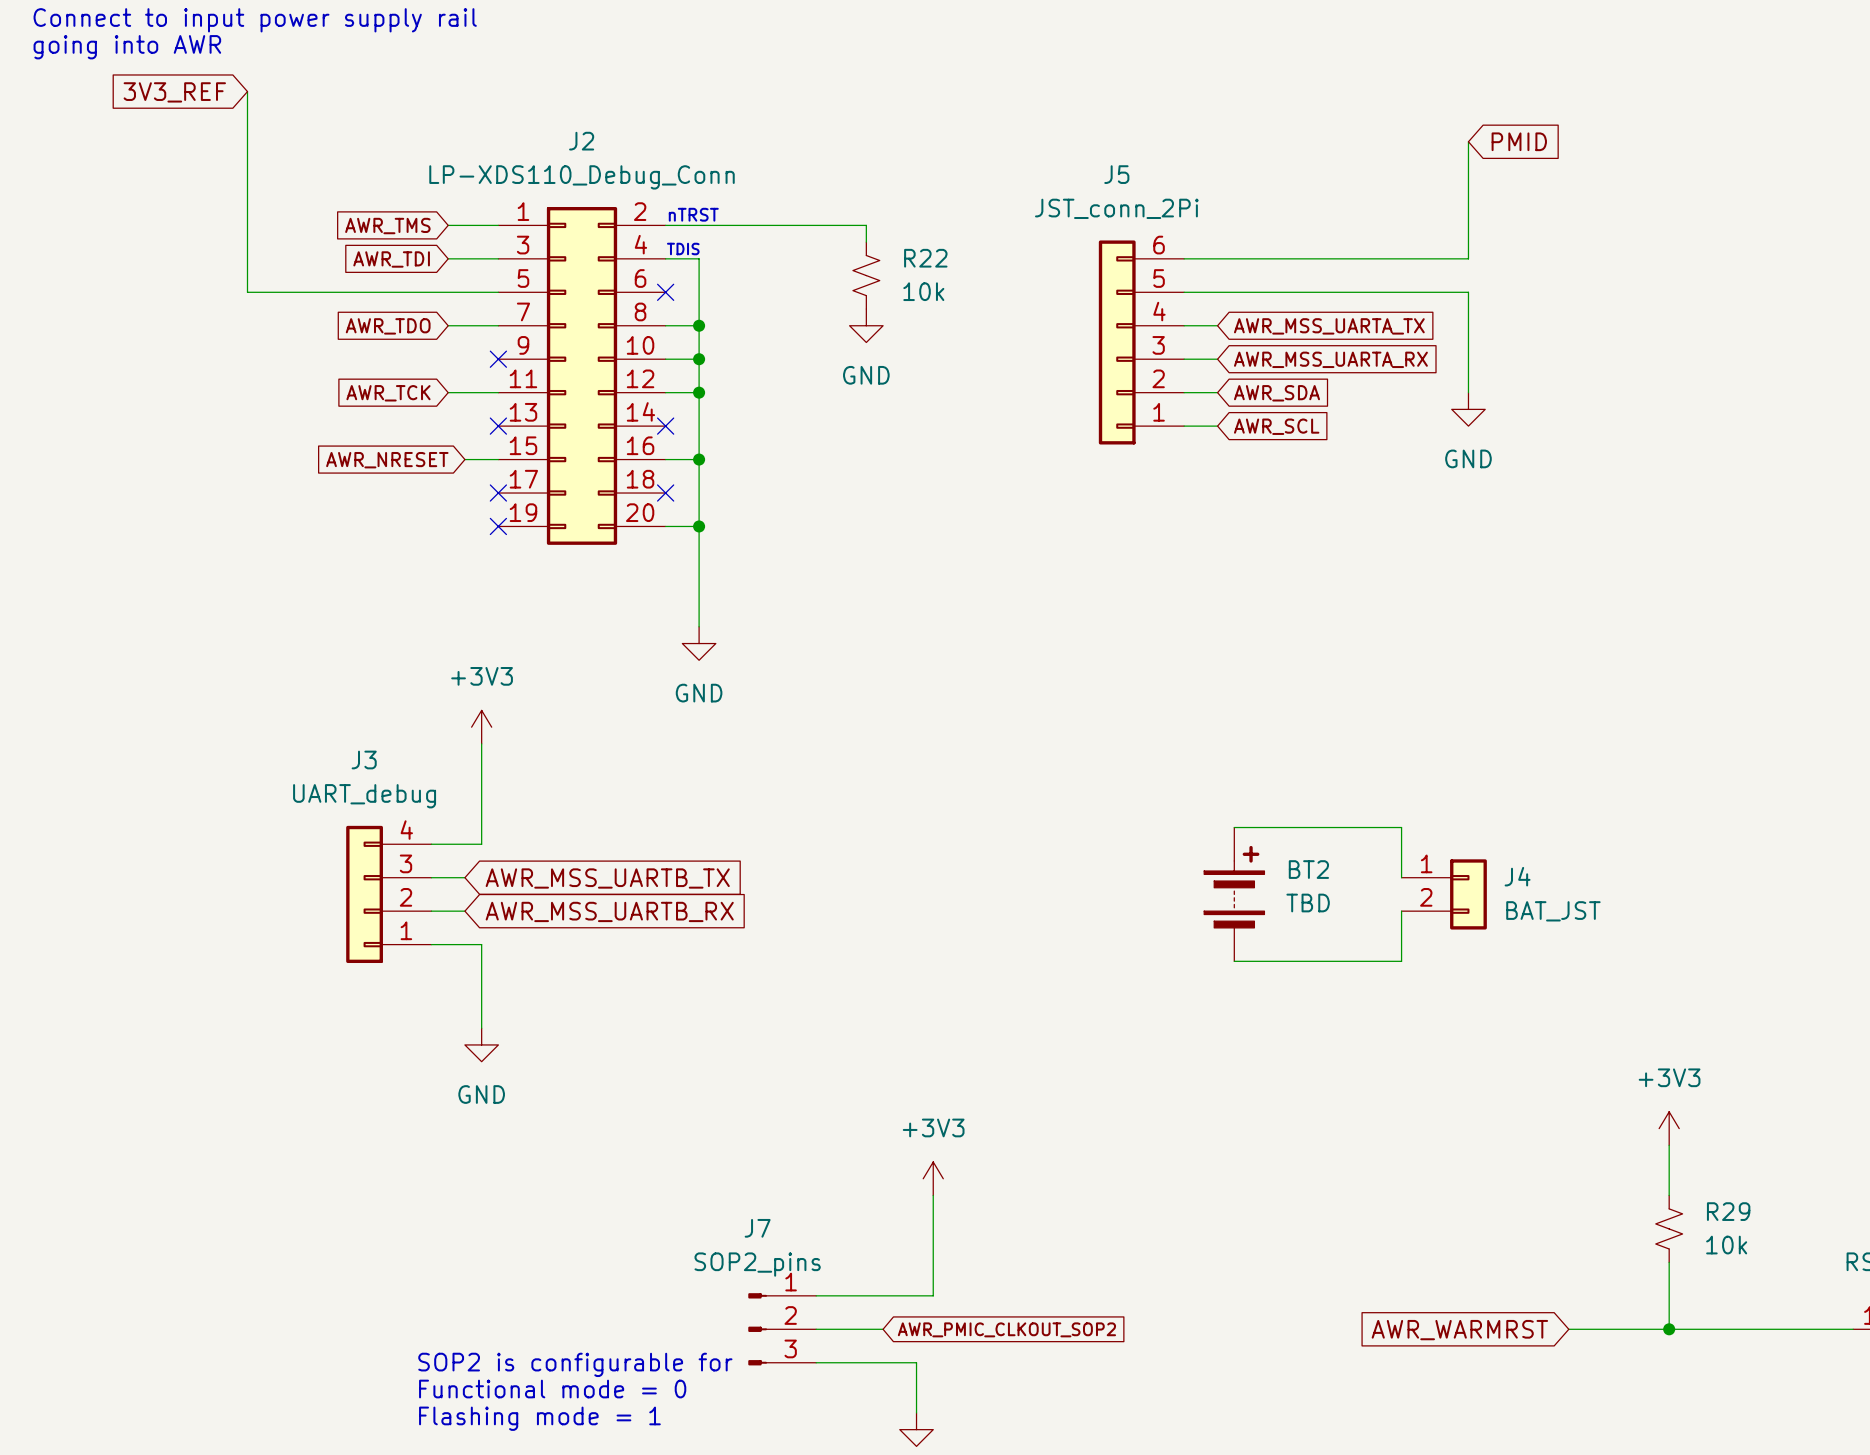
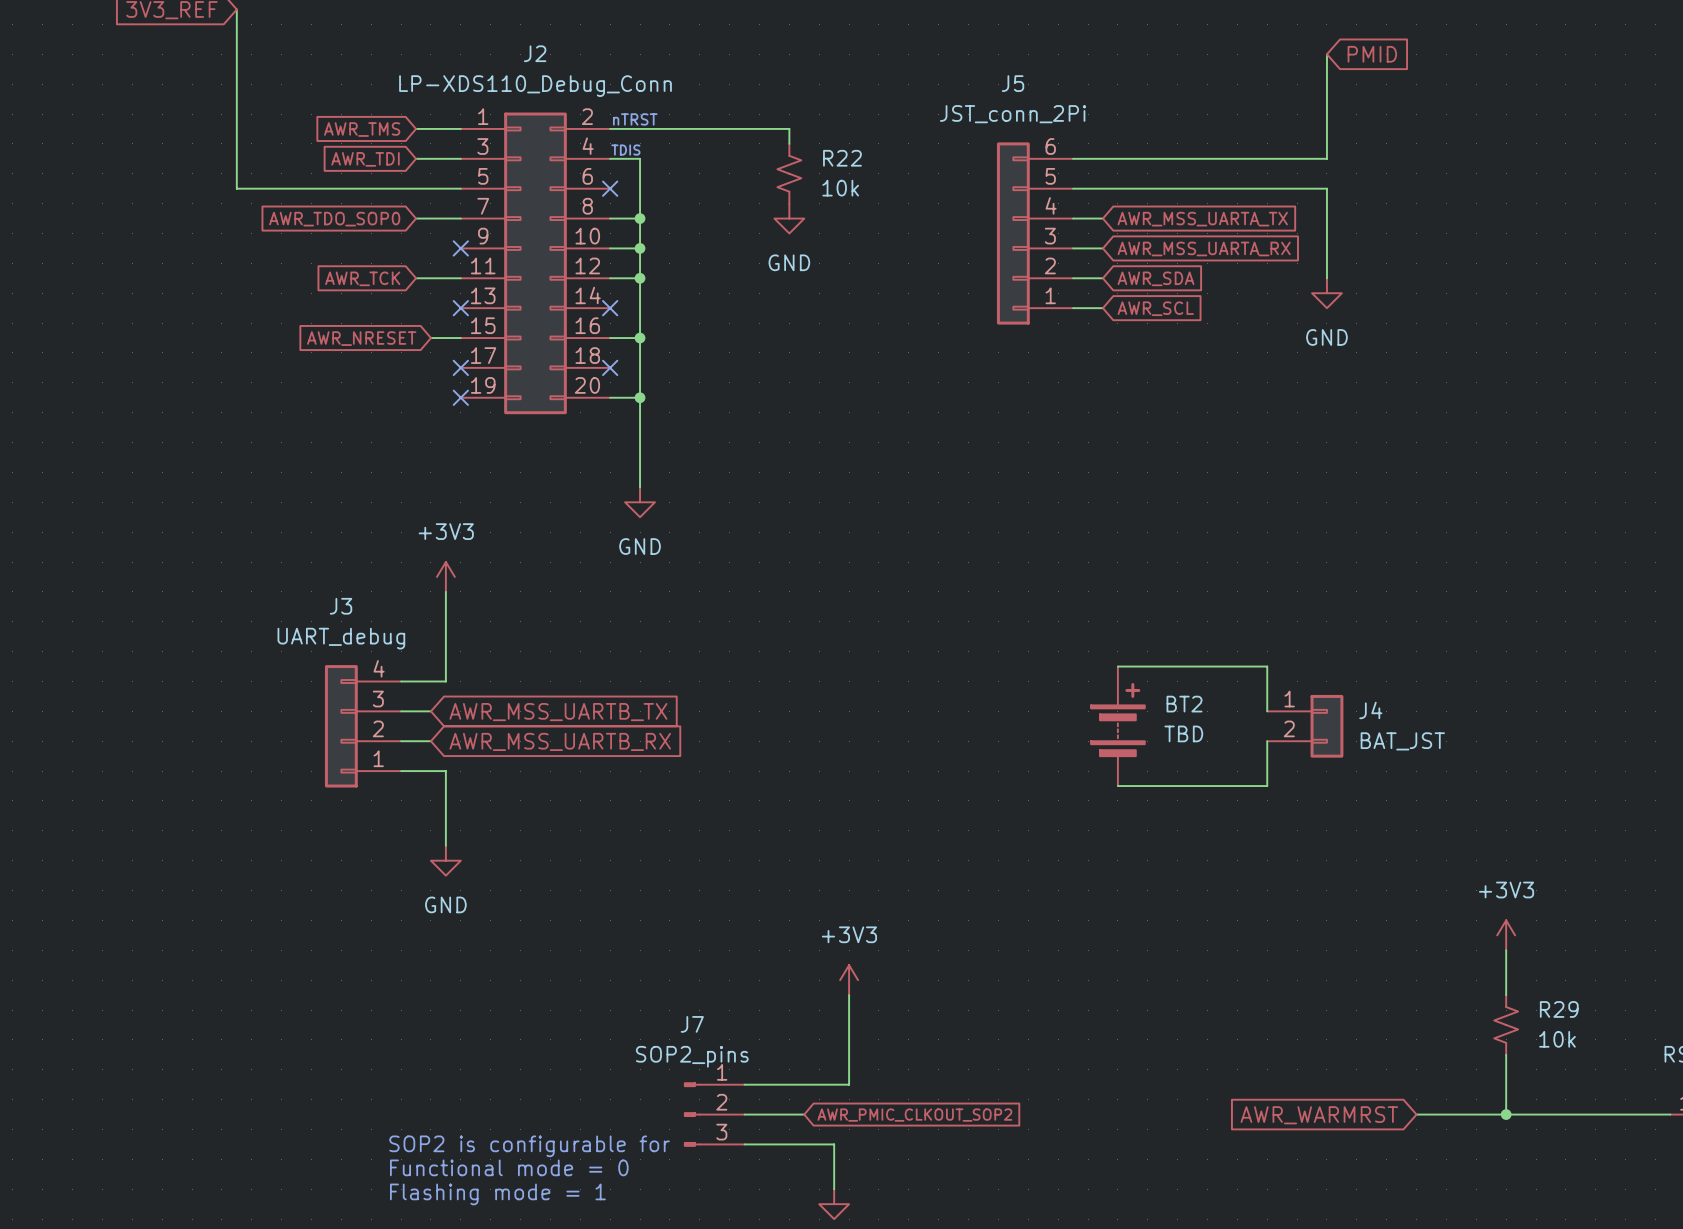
global label: AWR_TDO (388, 326) -> AWR_TDO_SOP0 (334, 219)

